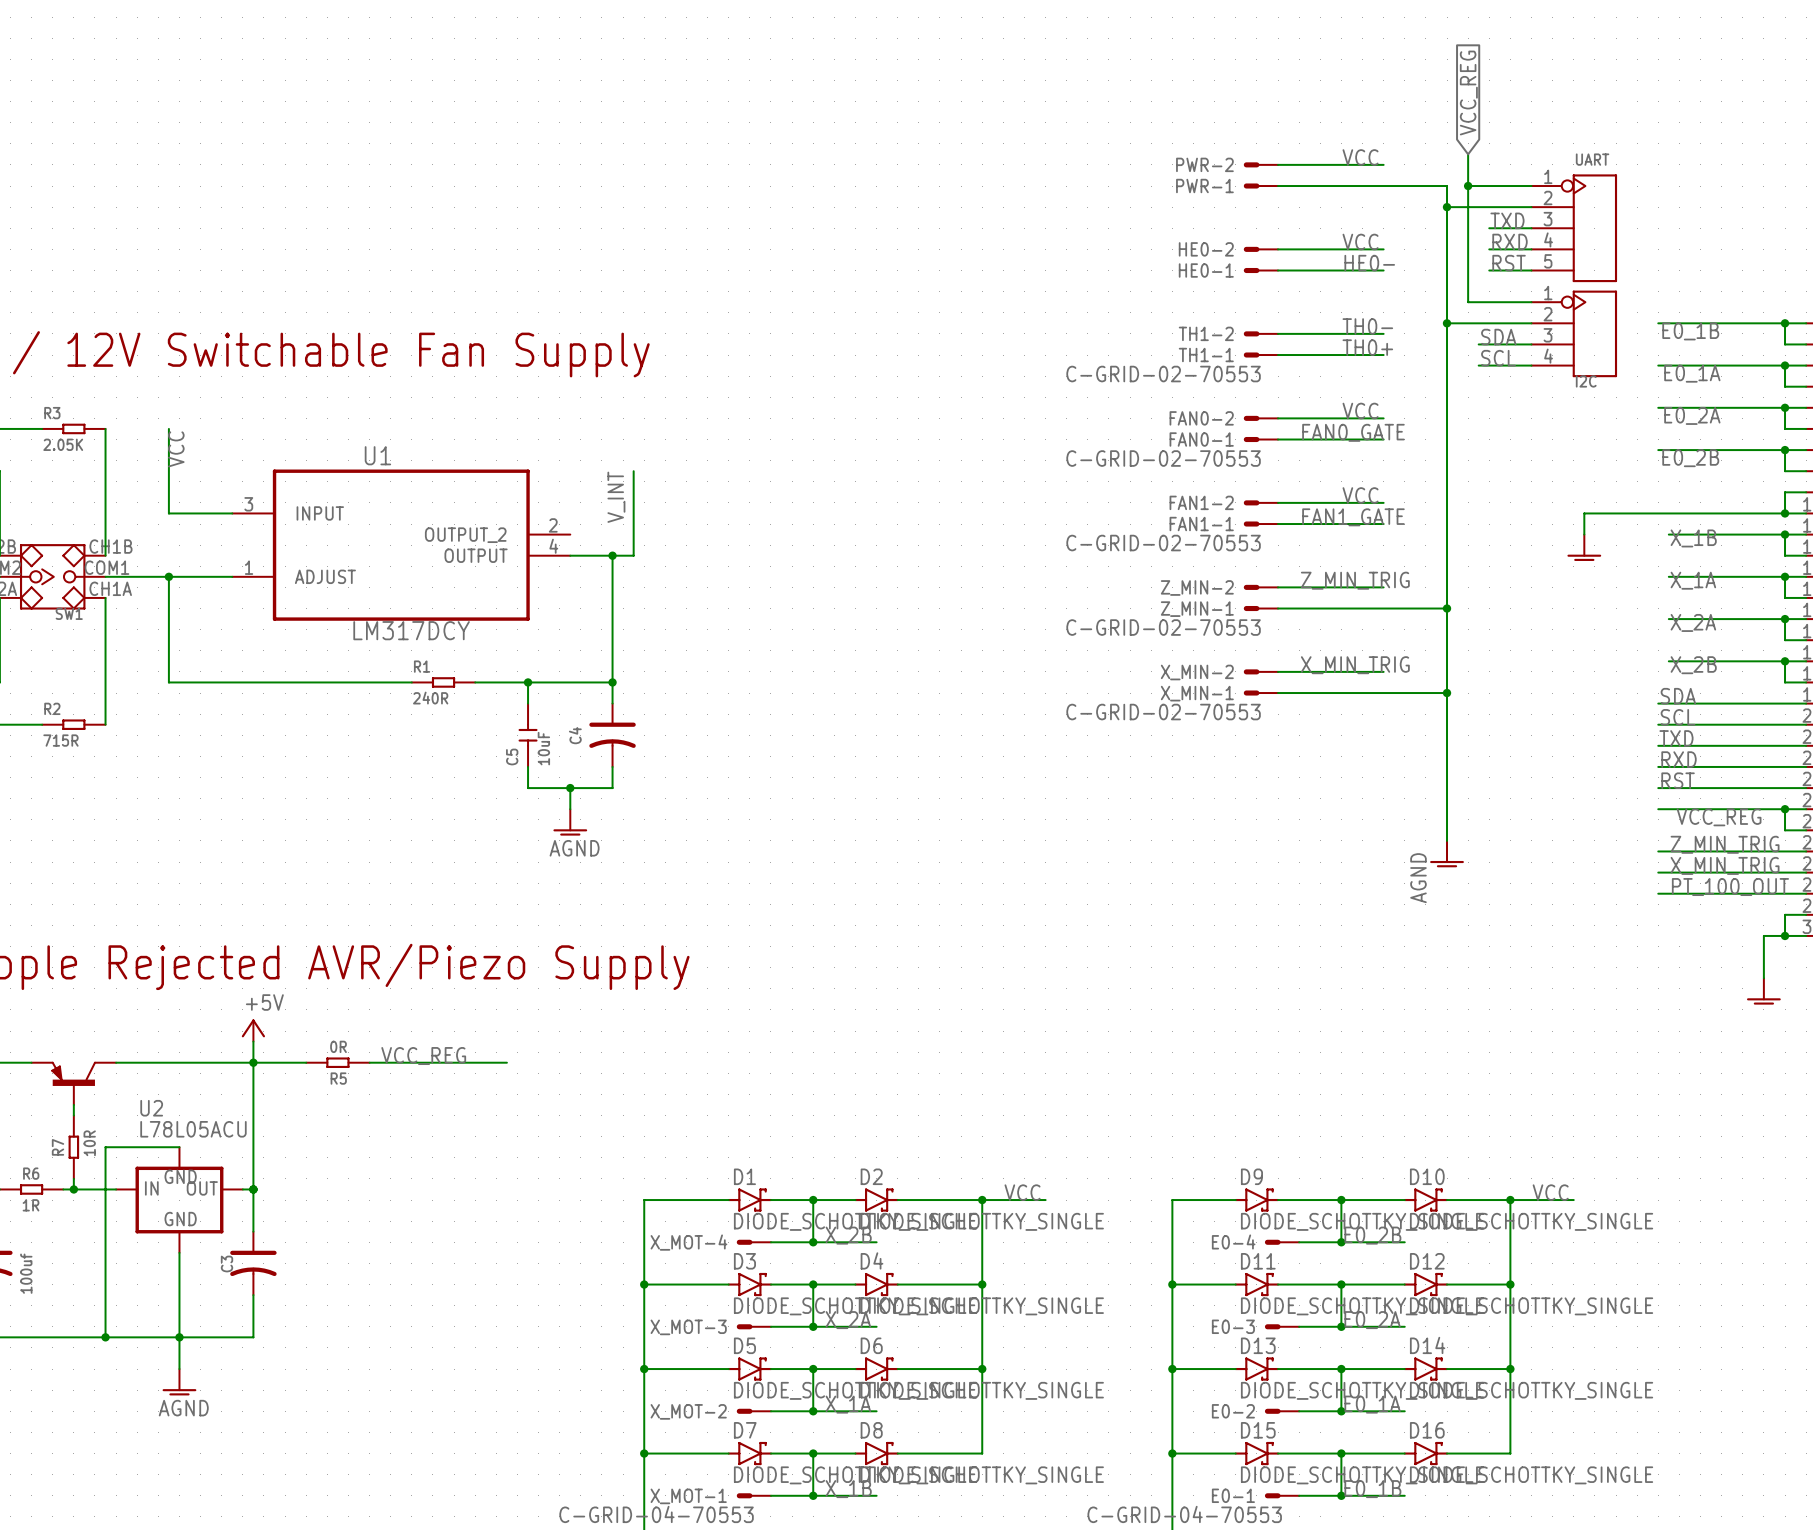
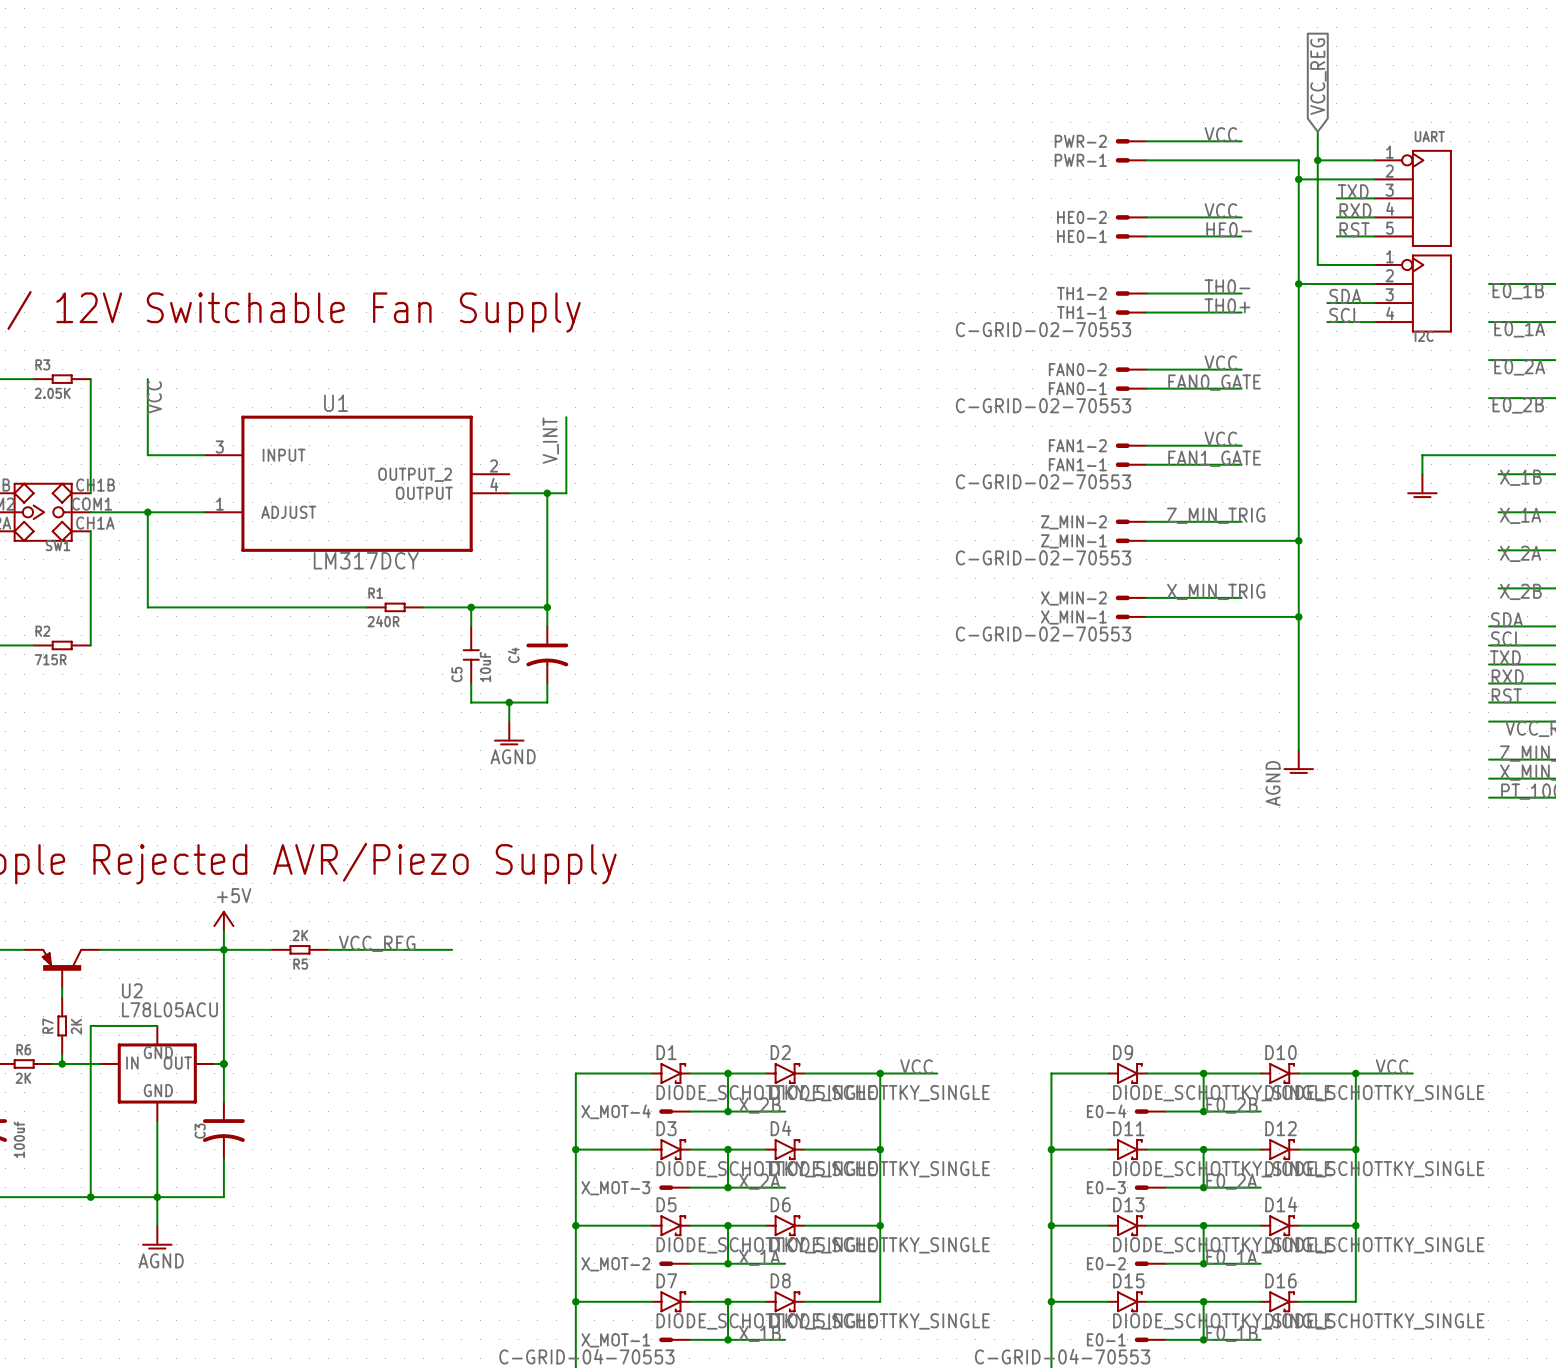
R5 value: 0R (338, 1046) -> 2K (300, 935)
R7 value: 10R (89, 1143) -> 2K (76, 1026)
R6 value: 1R (31, 1205) -> 2K (23, 1078)

